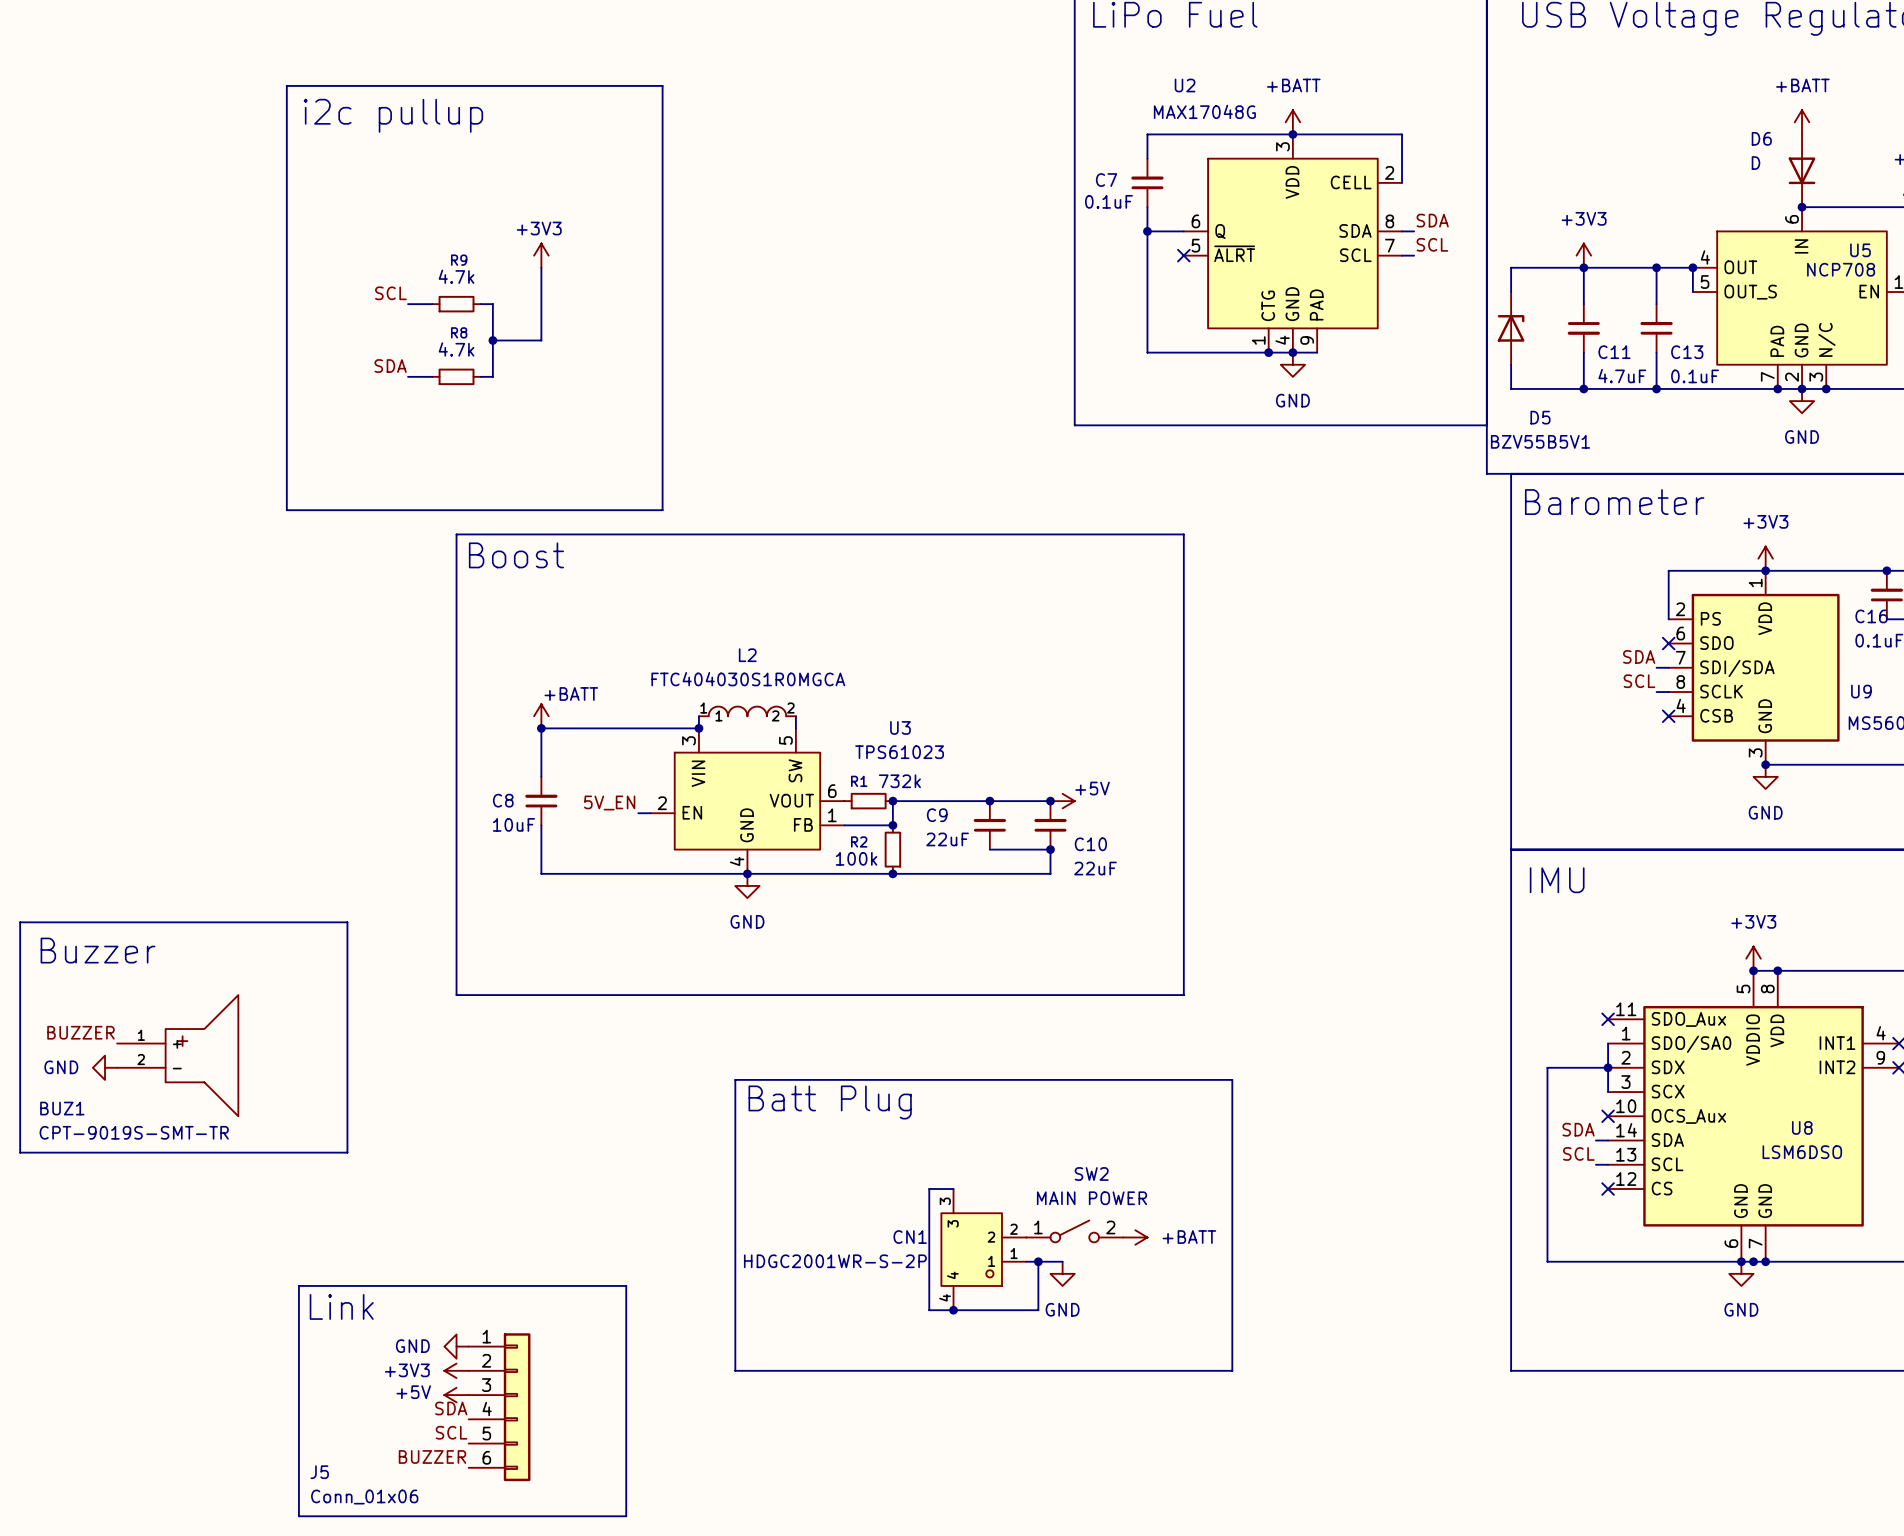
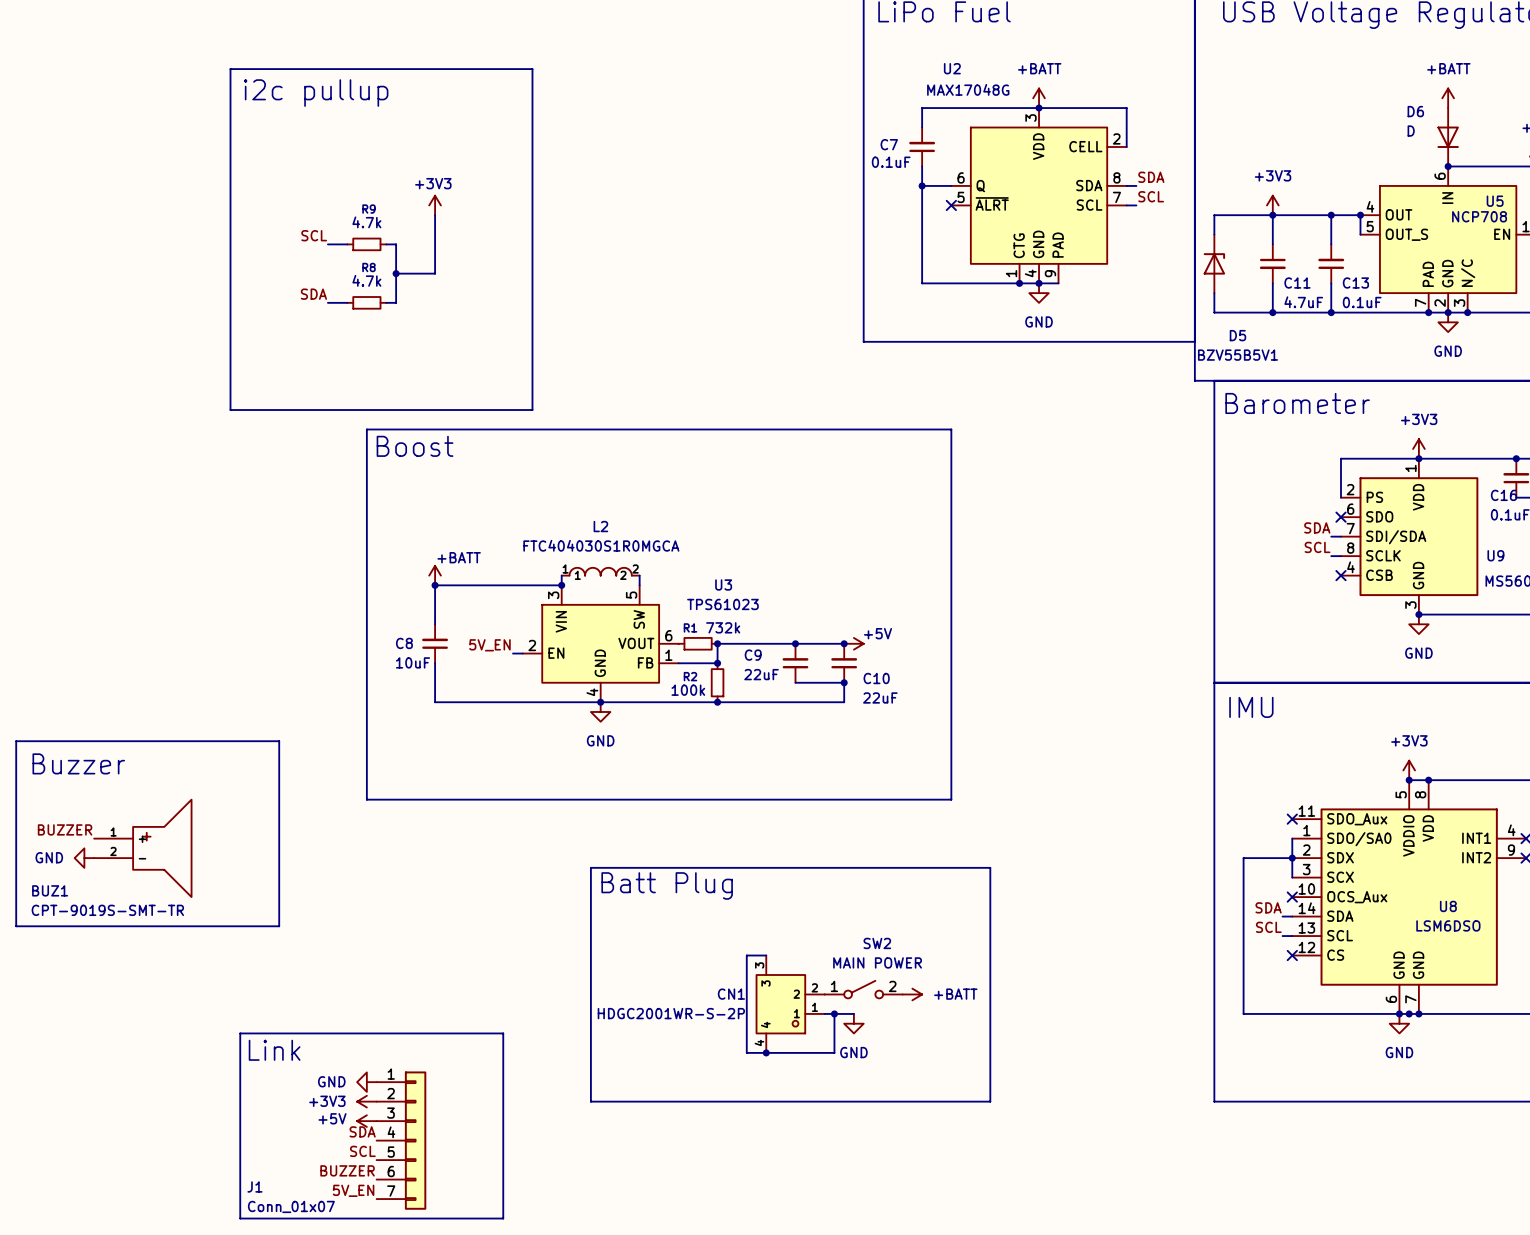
J5: Conn_01x06 (499, 1407) -> none
J1: none -> Conn_01x07 (401, 1140)
label: none -> 5V_EN (353, 1190)

